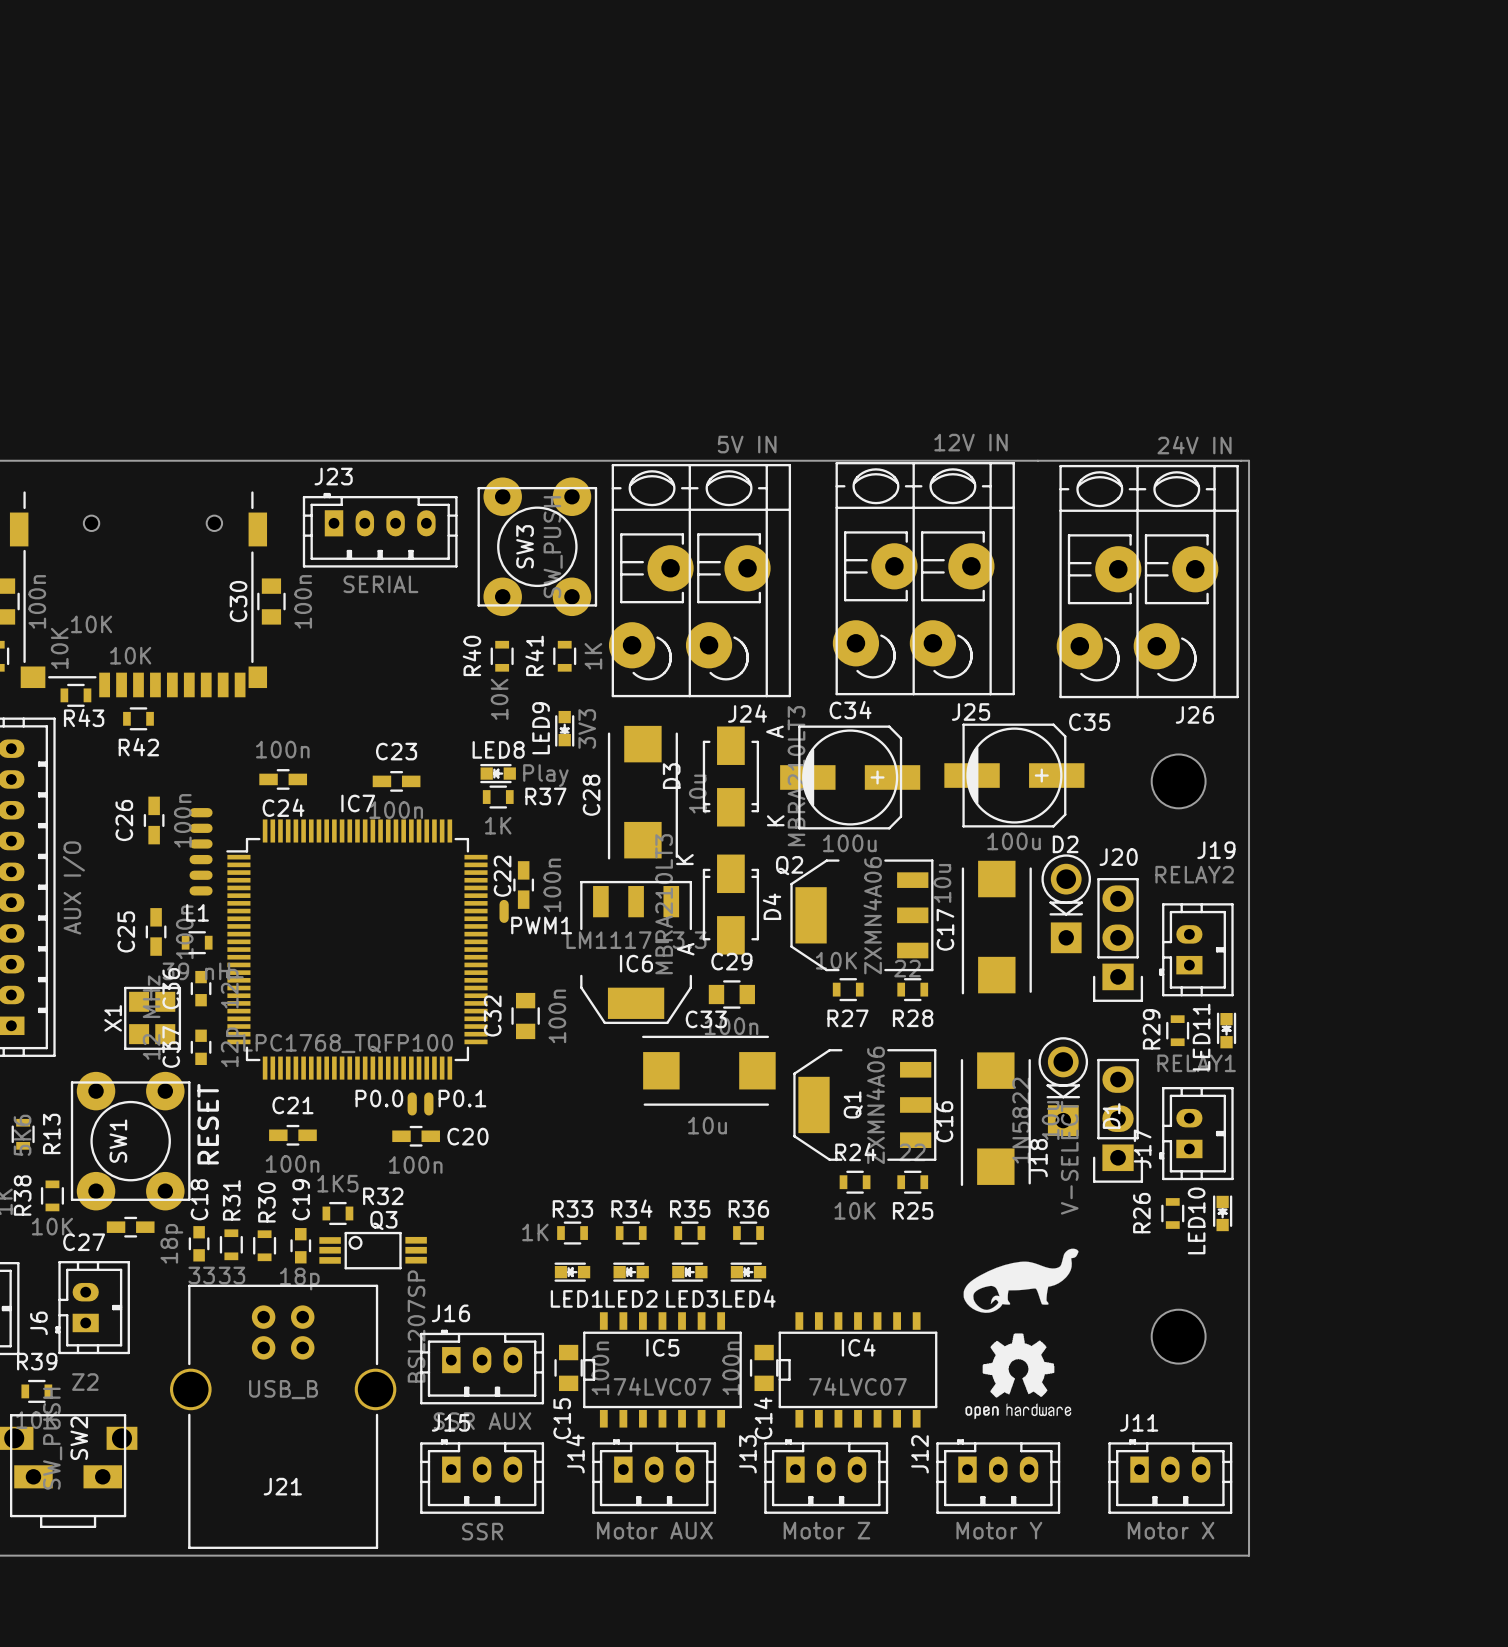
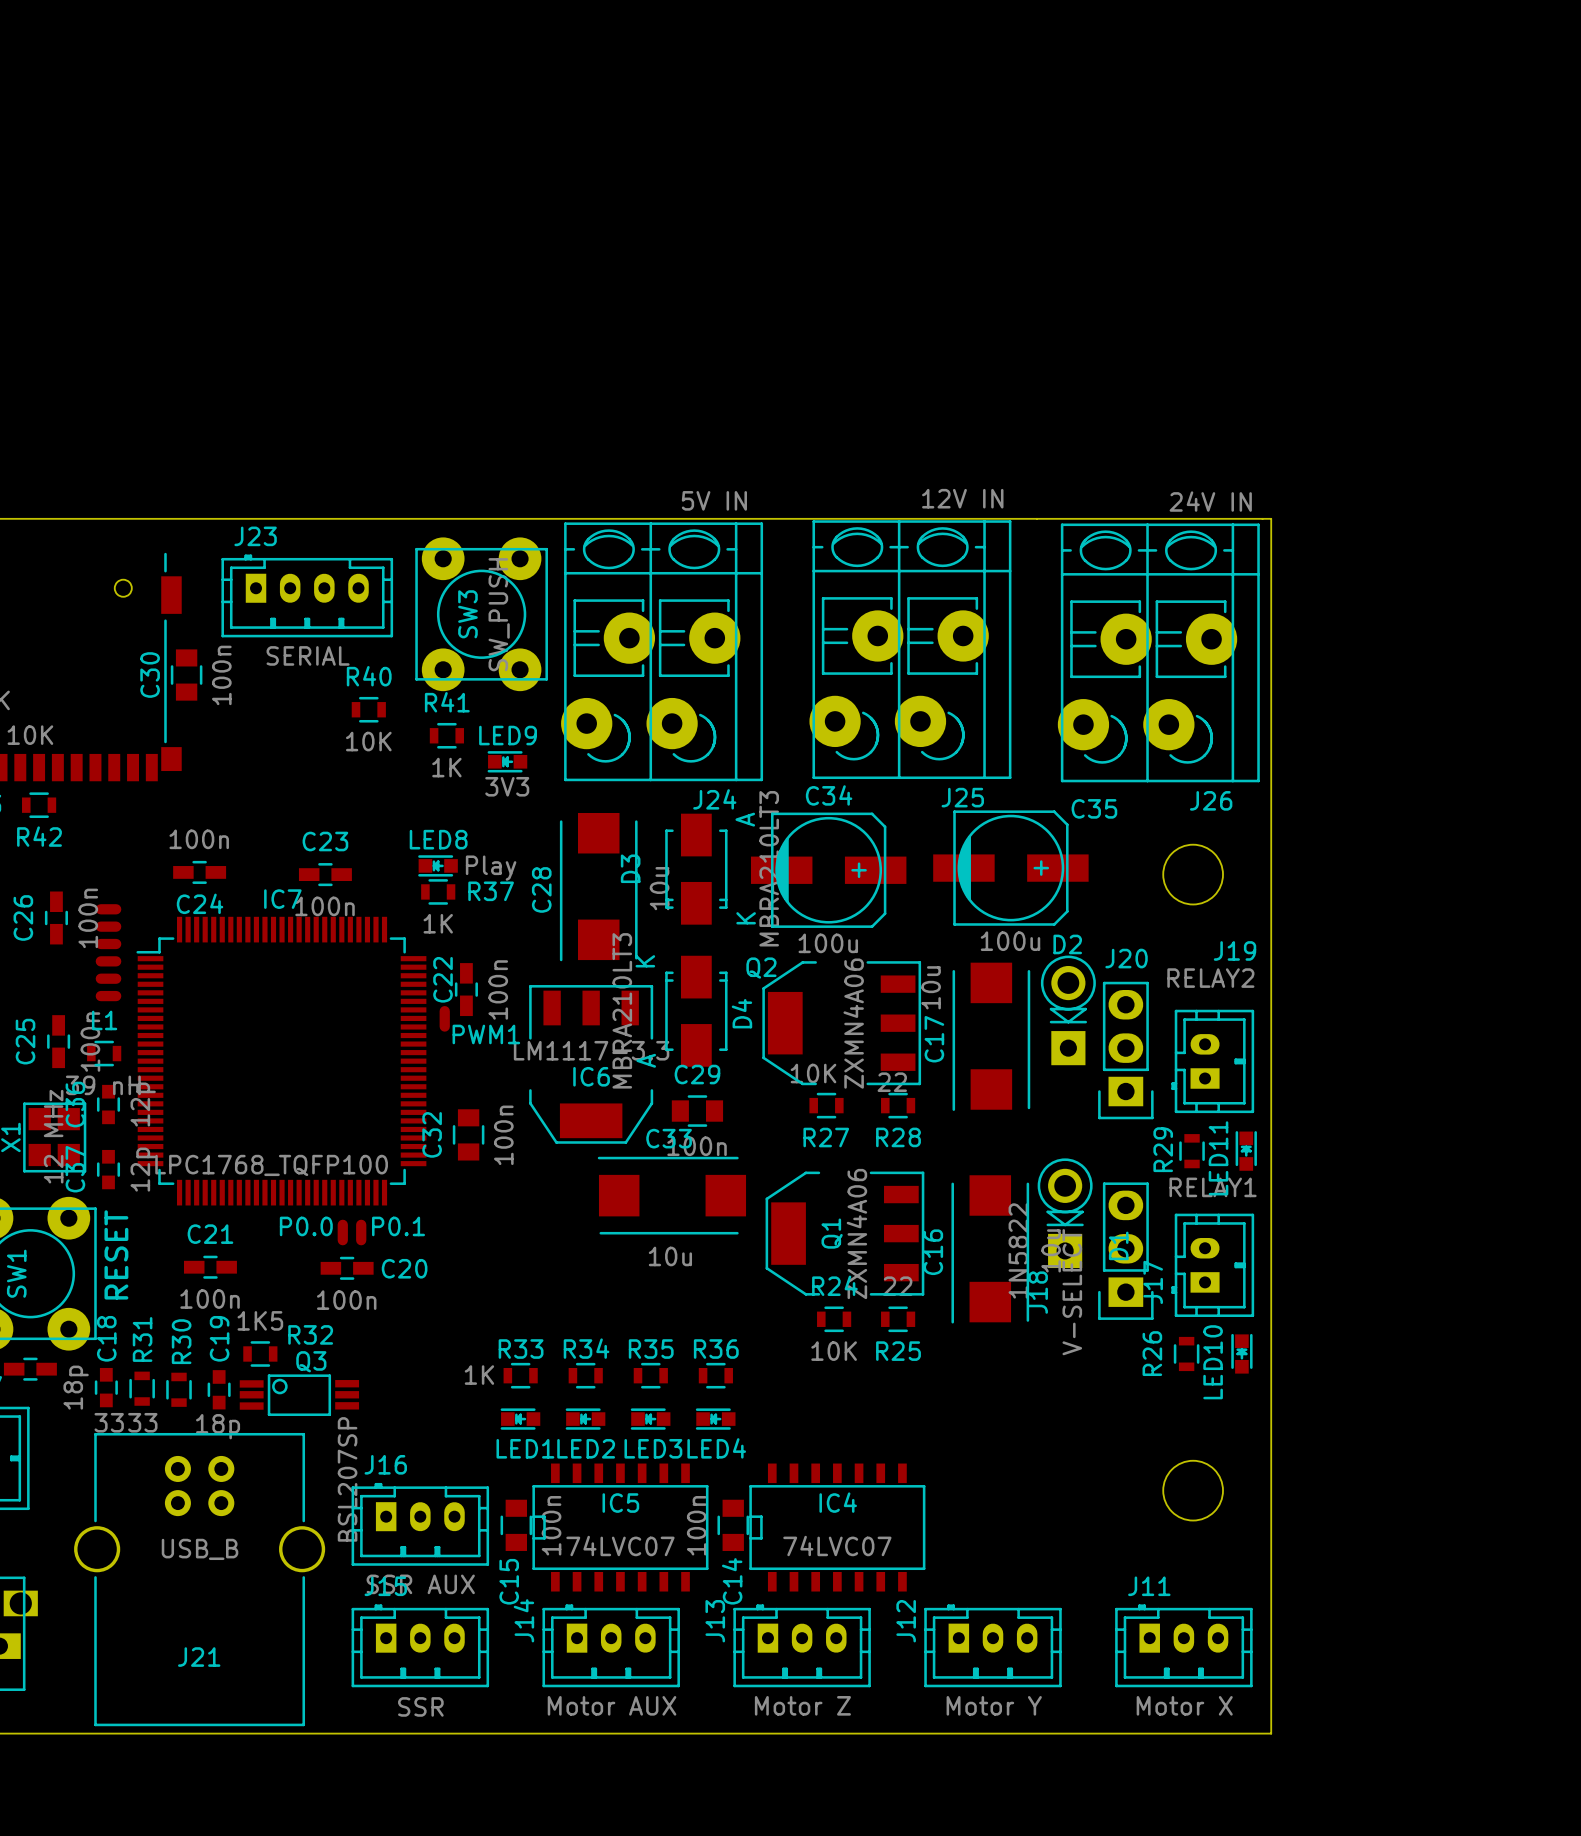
R40 rotation: 0° (502, 656) -> 90° clockwise (368, 709)
R40 position: (502, 656) -> (368, 709)
R41 rotation: 0° (564, 656) -> 90° clockwise (446, 735)
R41 position: (564, 656) -> (446, 735)
LED9 rotation: 0° (564, 728) -> 90° clockwise (507, 761)
LED9 position: (564, 728) -> (507, 761)
drawing: [963, 1248, 1079, 1313] -> none
drawing: [965, 1333, 1072, 1420] -> none

